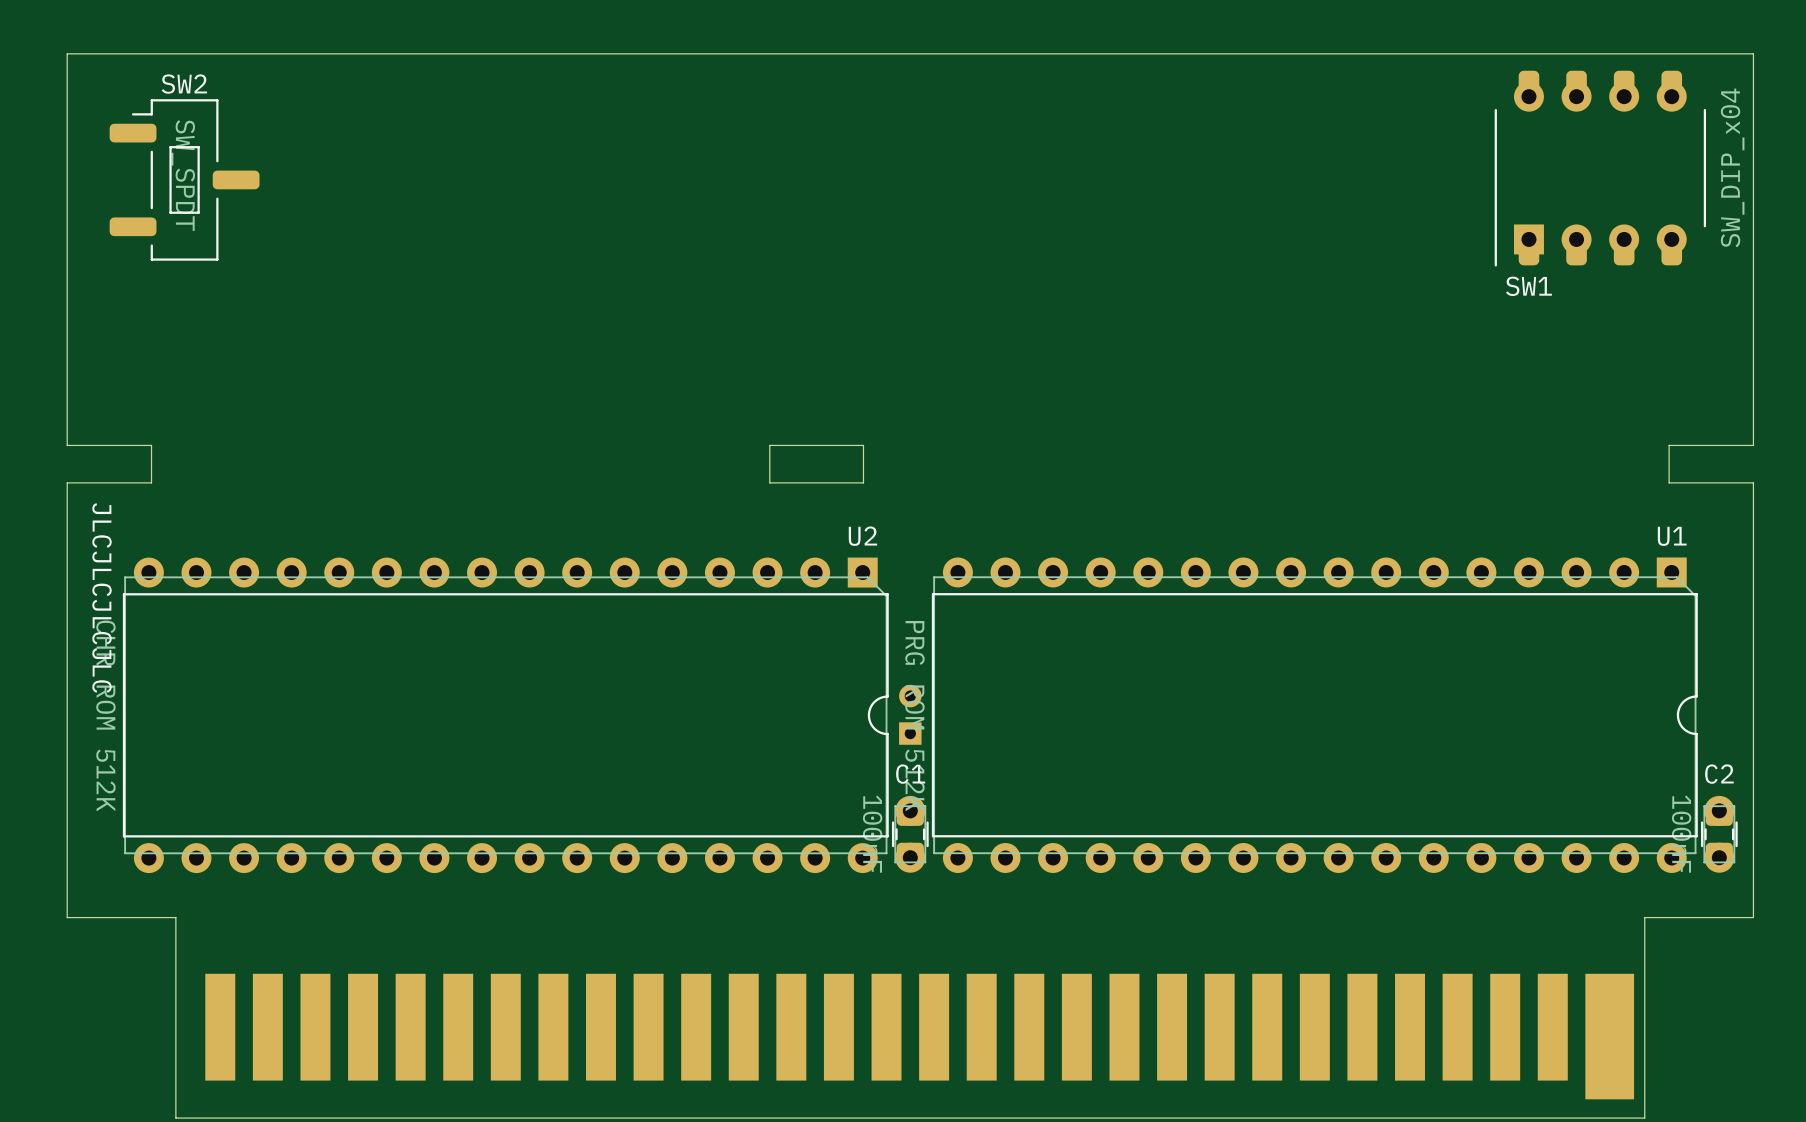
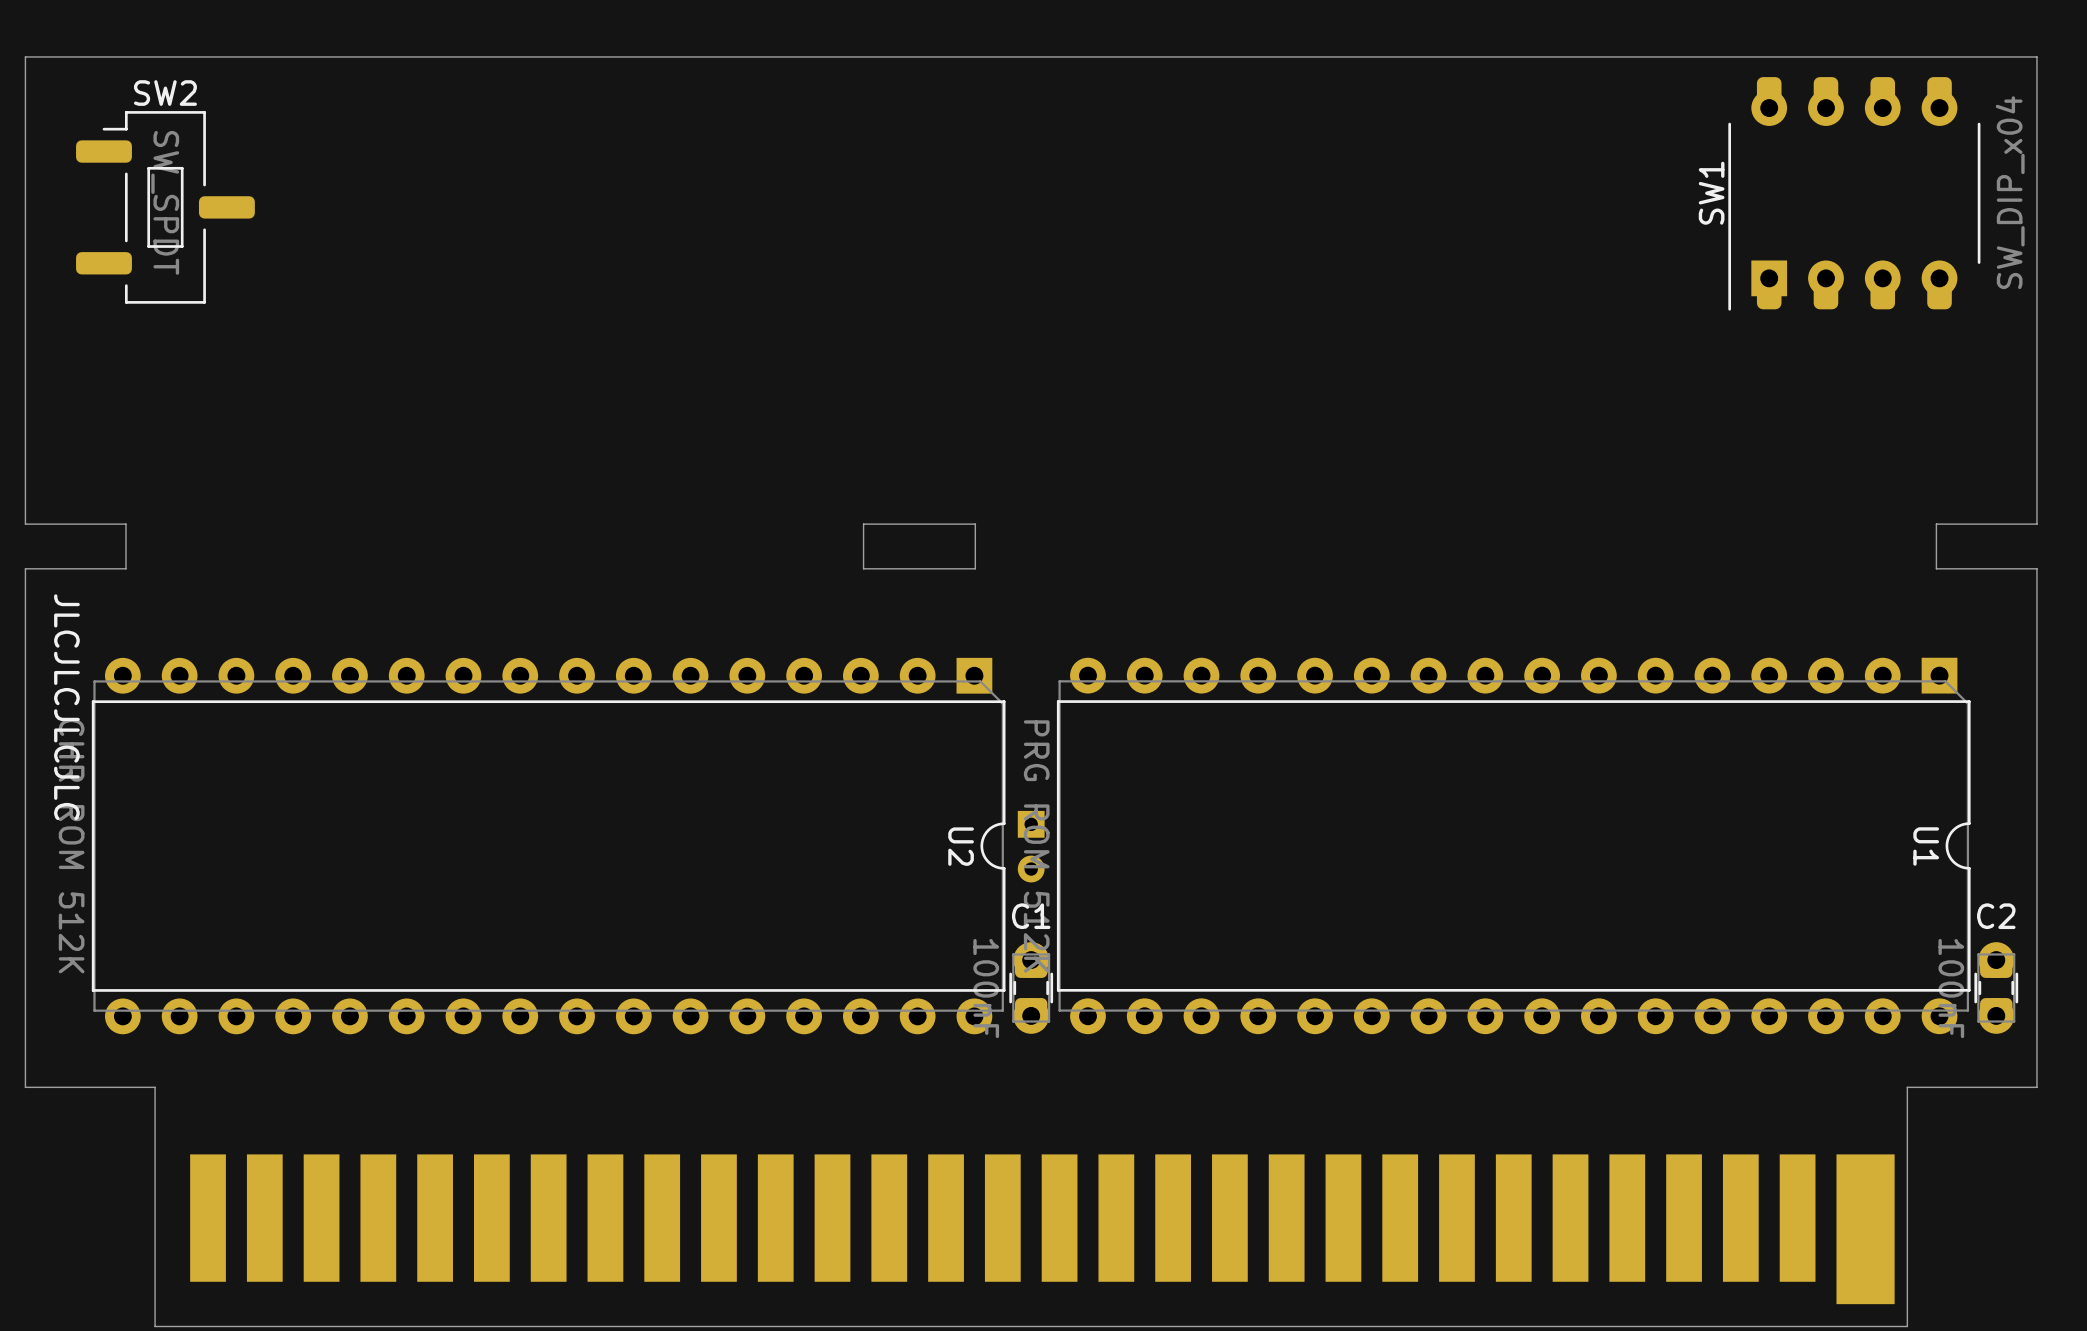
SW1 name rotation: 0° (1528, 286) -> 90° counterclockwise (1711, 193)
SW1 name position: SW1 (1528, 286) -> SW1 (1711, 193)
U2 name rotation: 0° (862, 536) -> 90° clockwise (961, 846)
U2 name position: U2 (862, 536) -> U2 (961, 846)
U1 name rotation: 0° (1672, 536) -> 90° clockwise (1926, 846)
U1 name position: U1 (1672, 536) -> U1 (1926, 846)
part rotation: 0° (910, 714) -> 180° (1031, 846)

